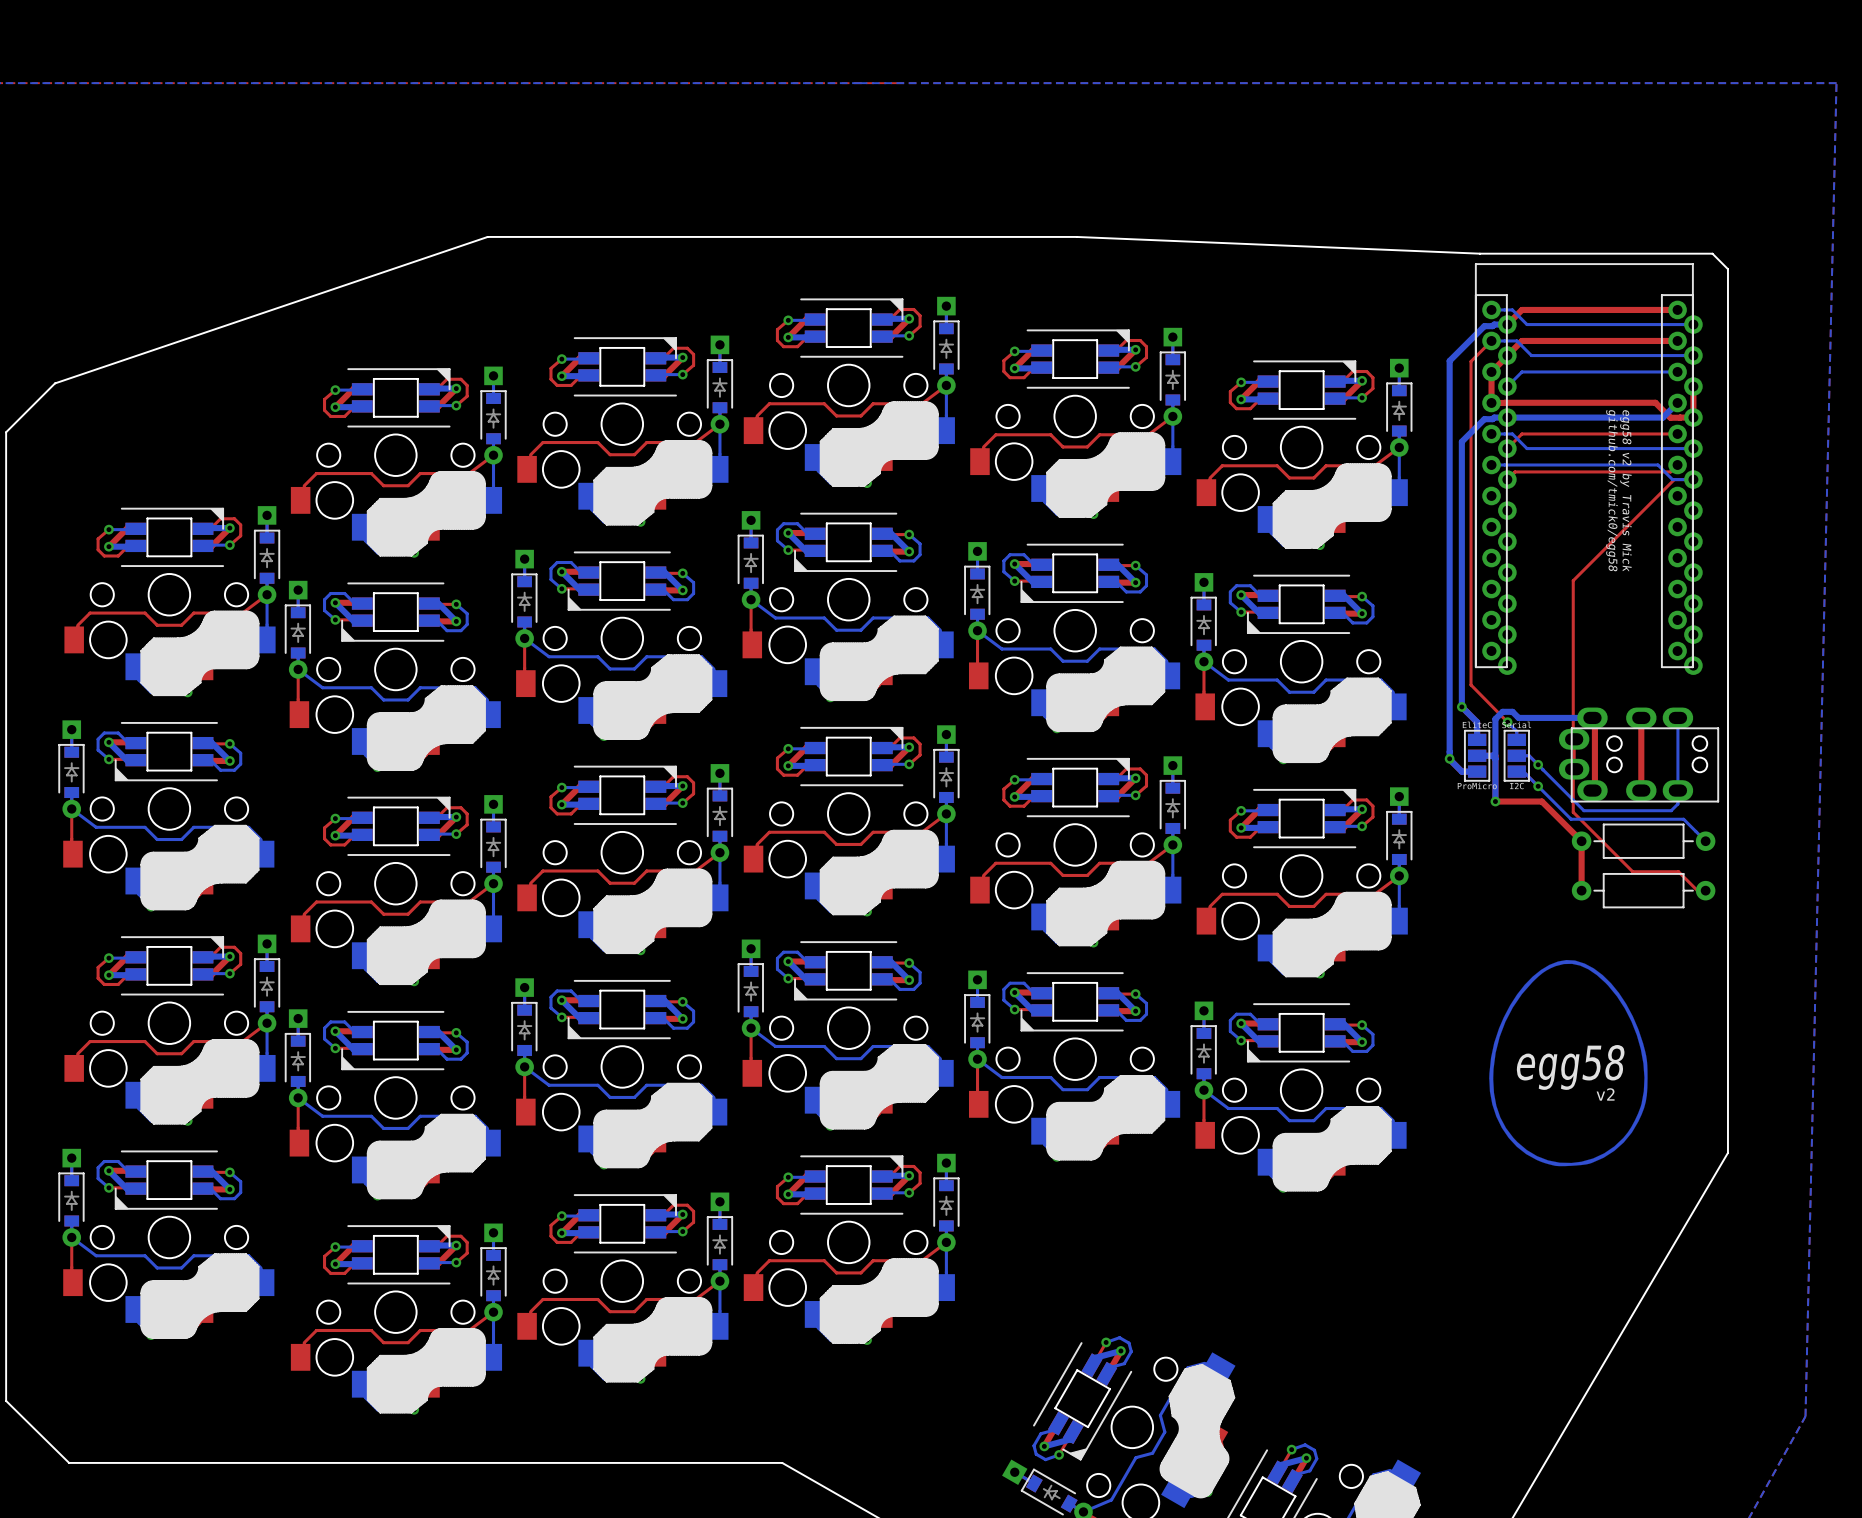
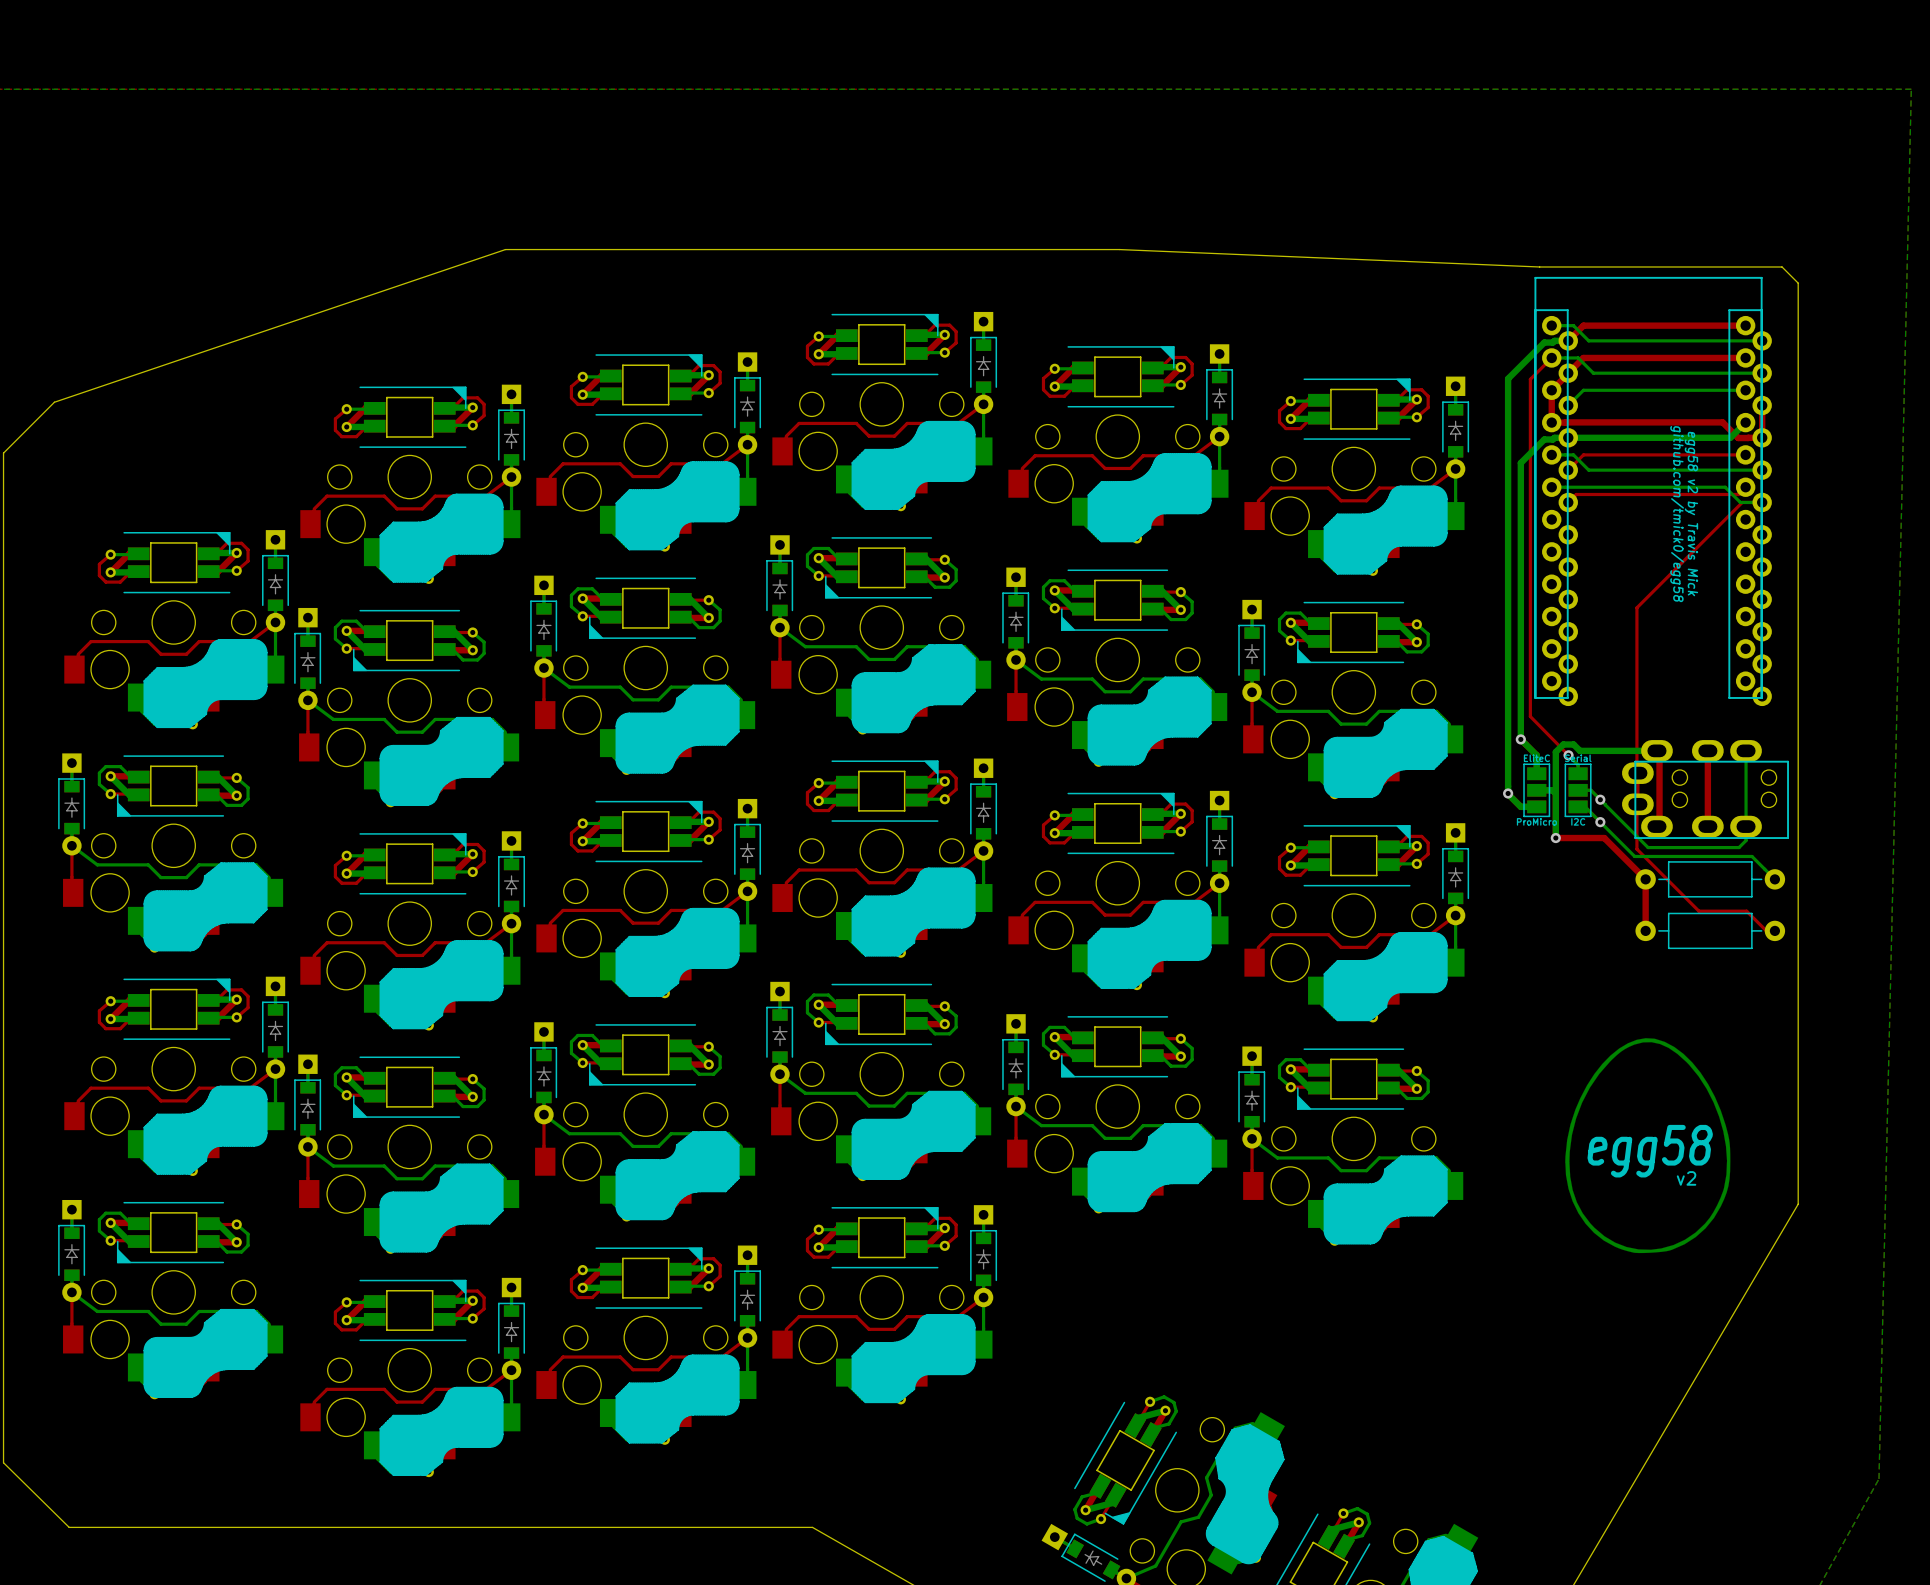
drawing position: (1568, 1063) -> (1647, 1145)

